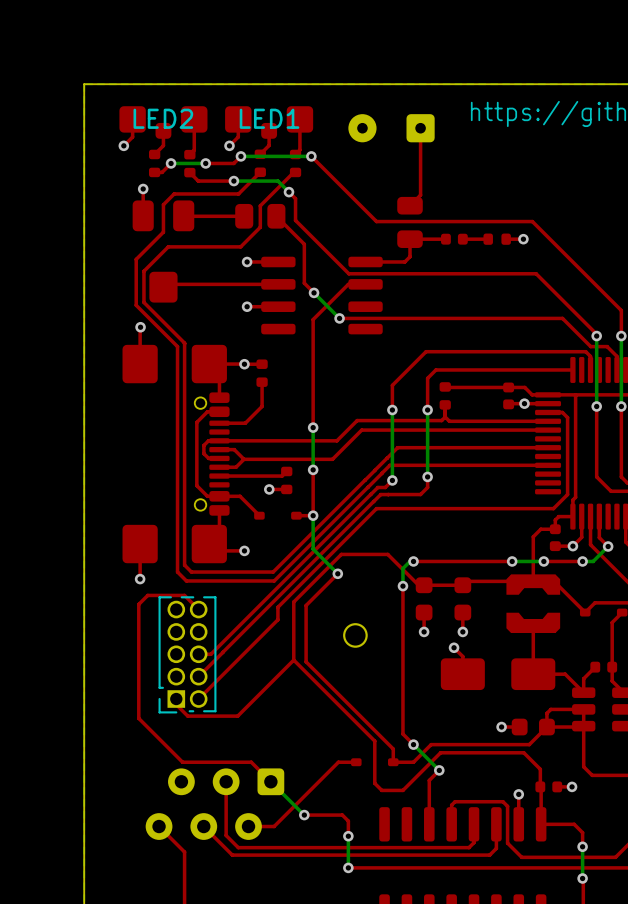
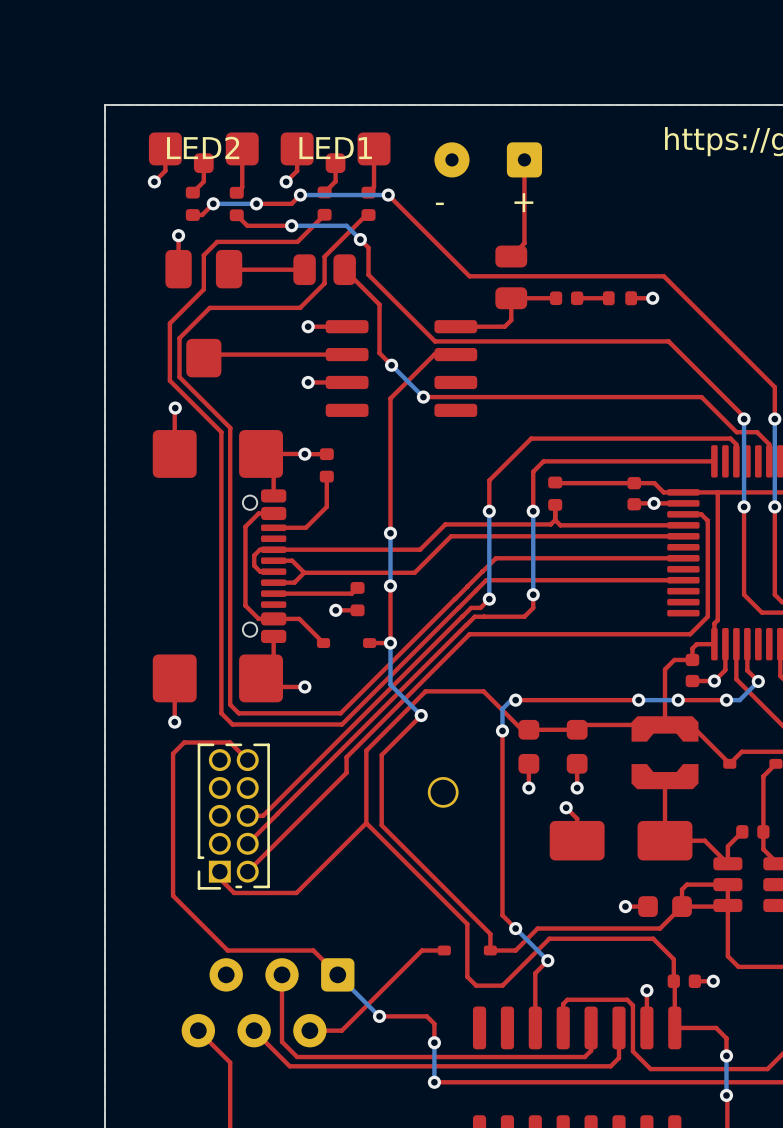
text: none -> - (439, 203)
text: none -> + (523, 202)

